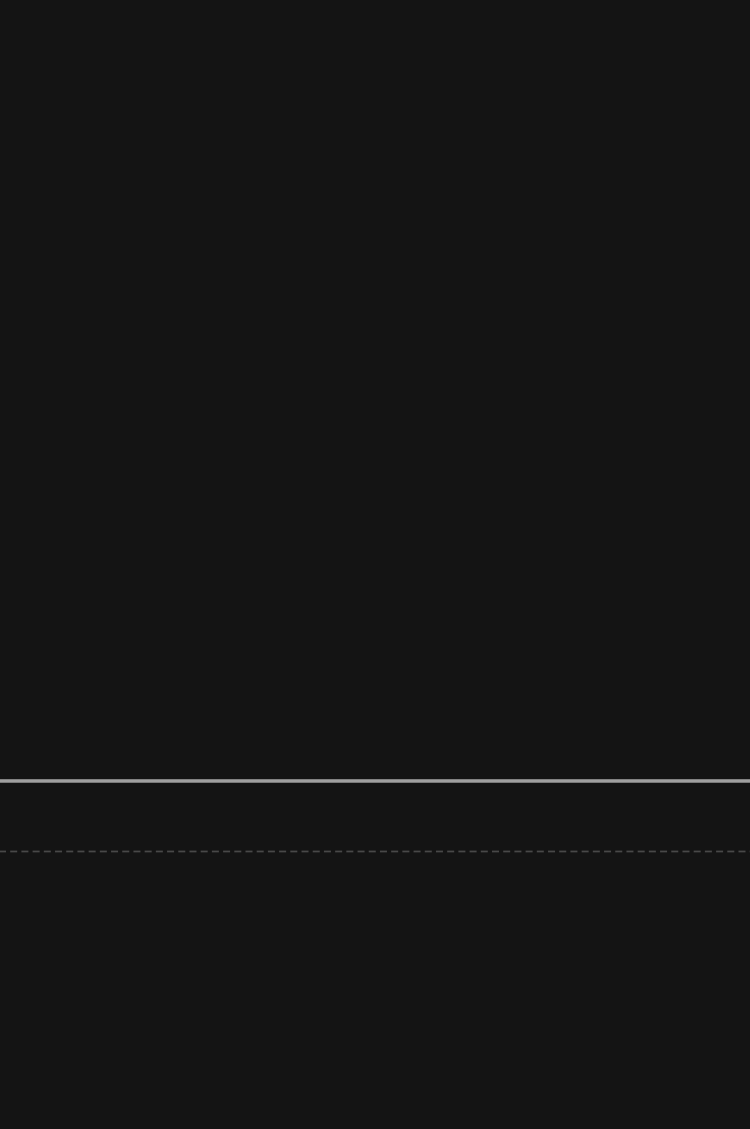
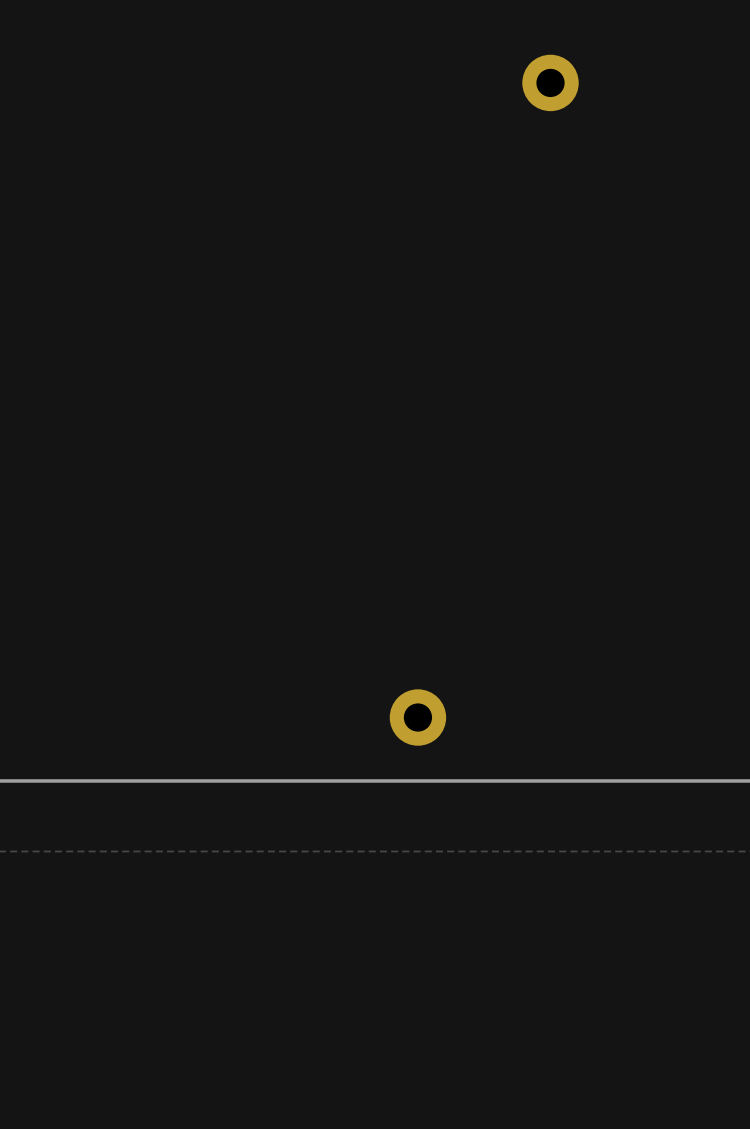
via: none -> (550, 82)
via: none -> (417, 717)

